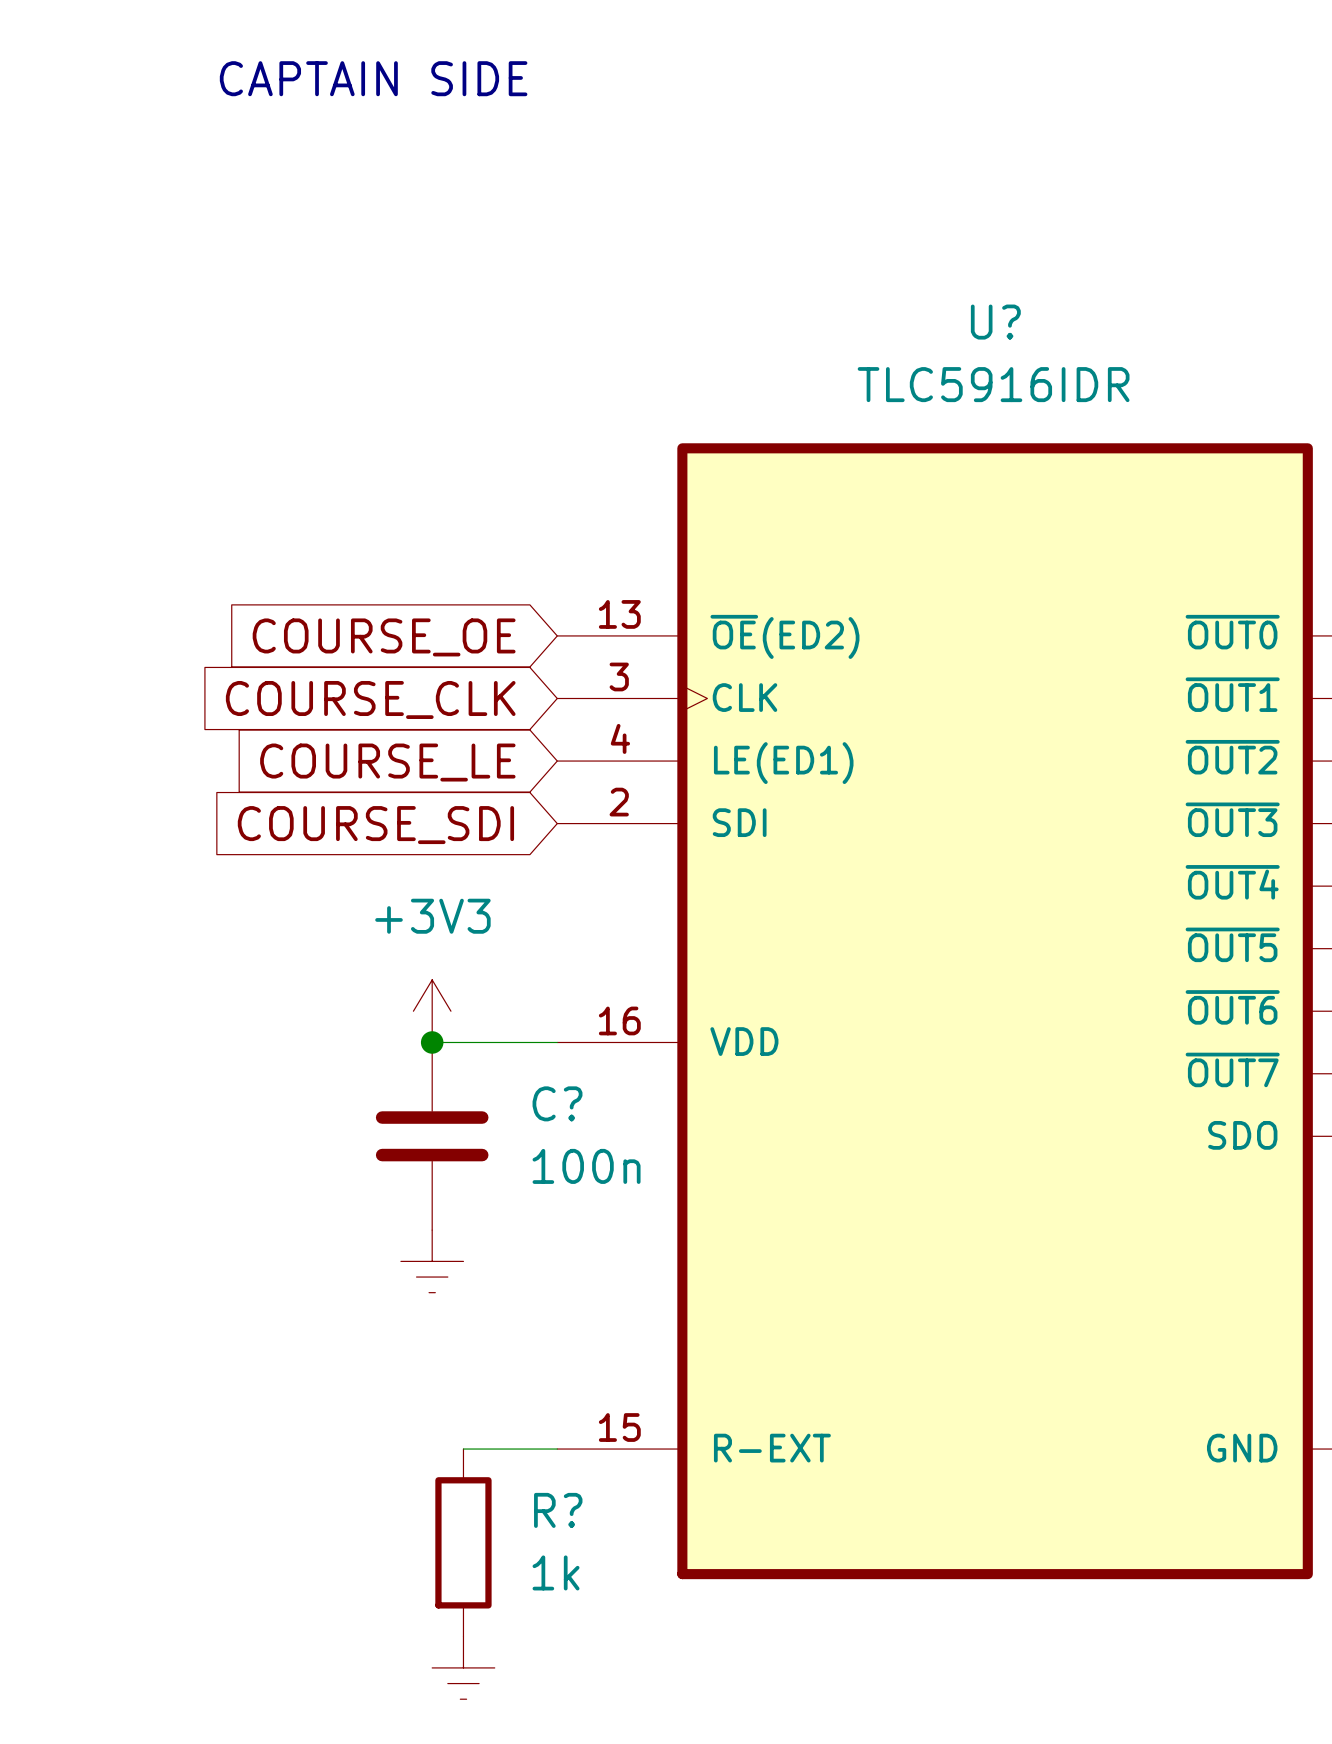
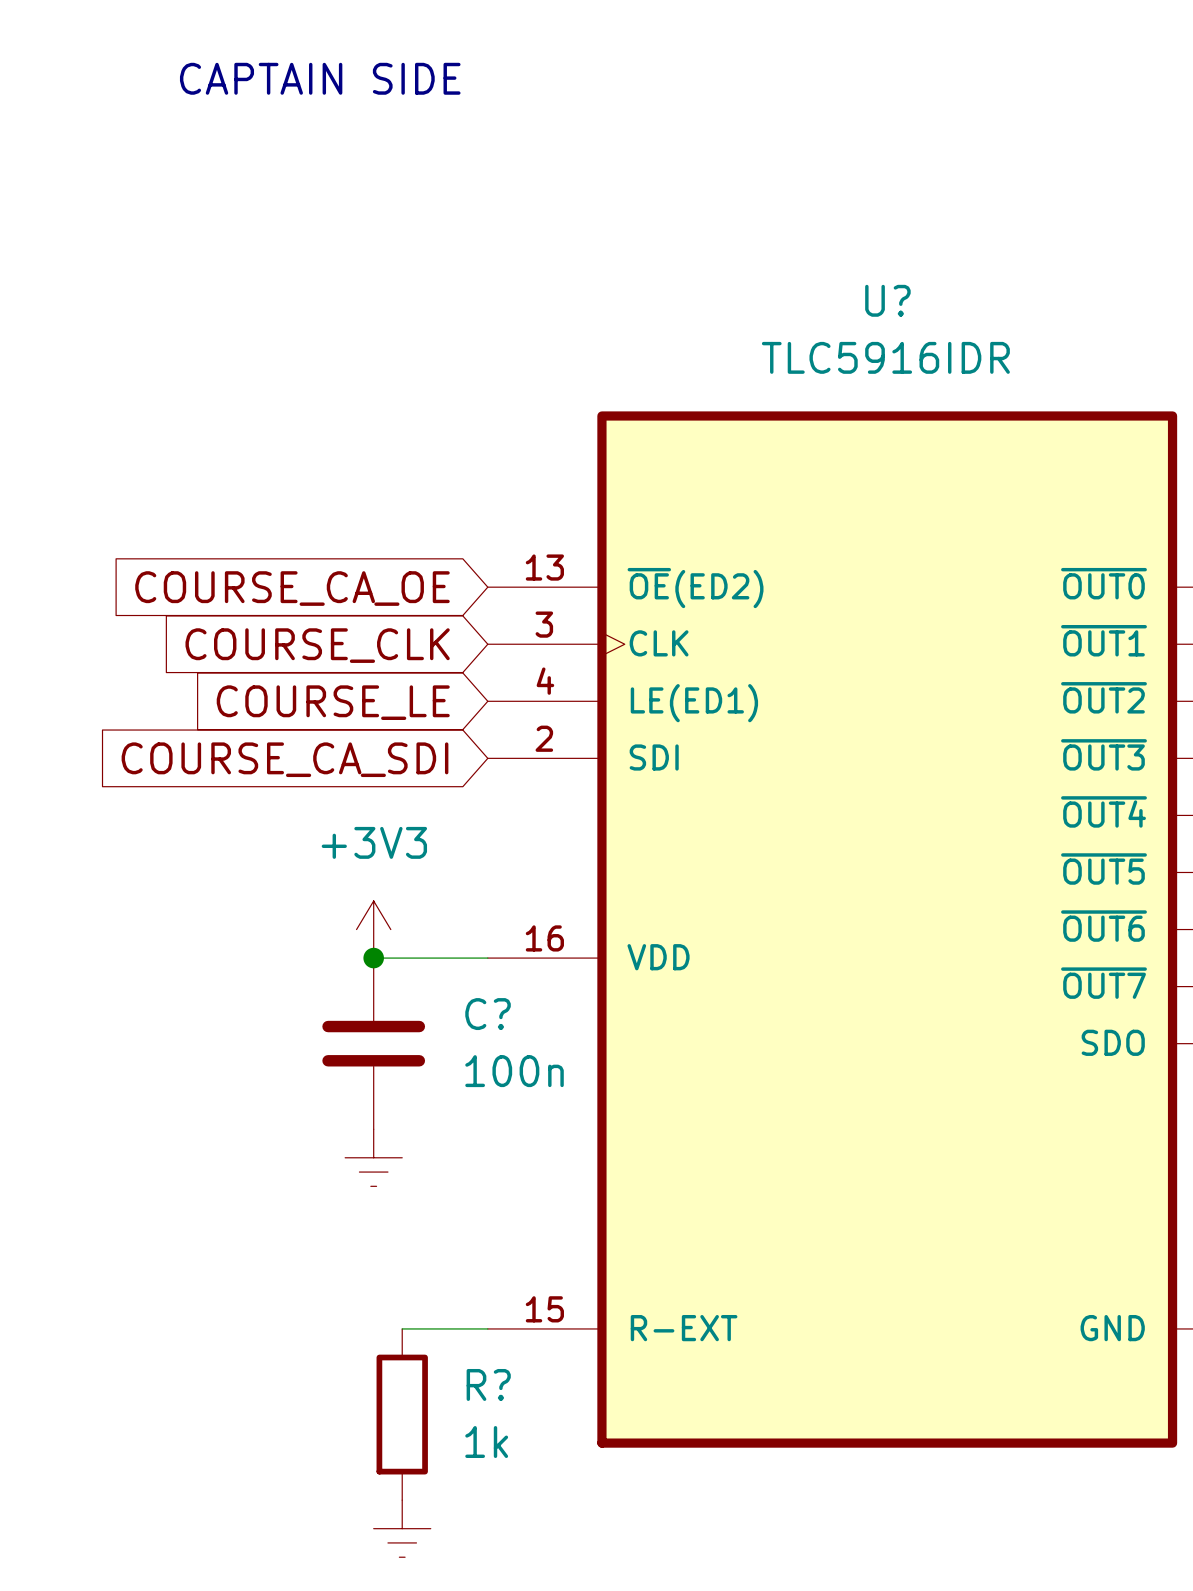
global label: COURSE_OE (384, 637) -> COURSE_CA_OE (292, 588)
global label: COURSE_SDI (375, 825) -> COURSE_CA_SDI (285, 759)

